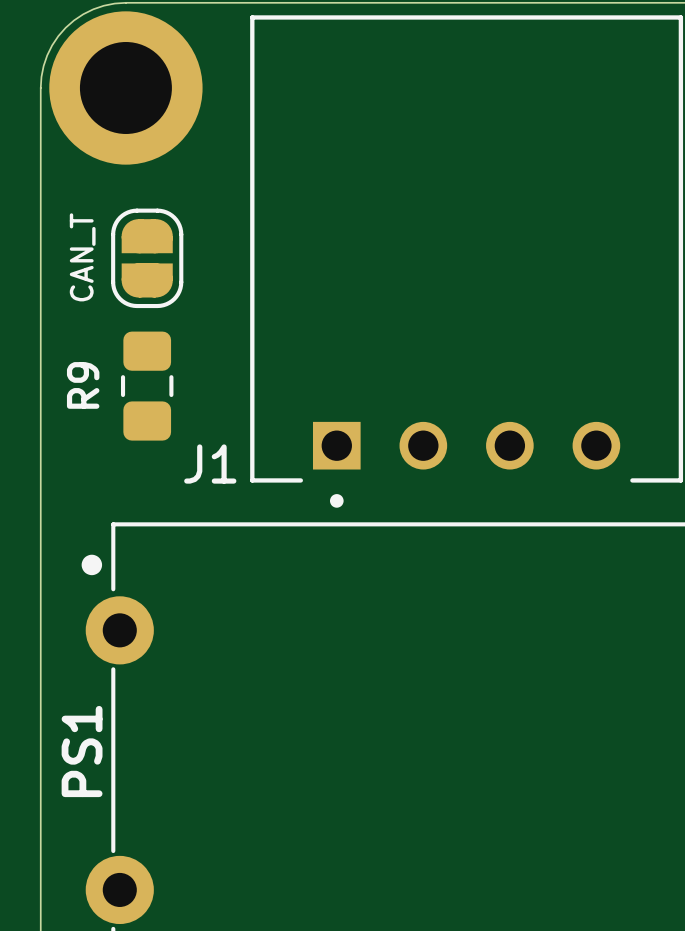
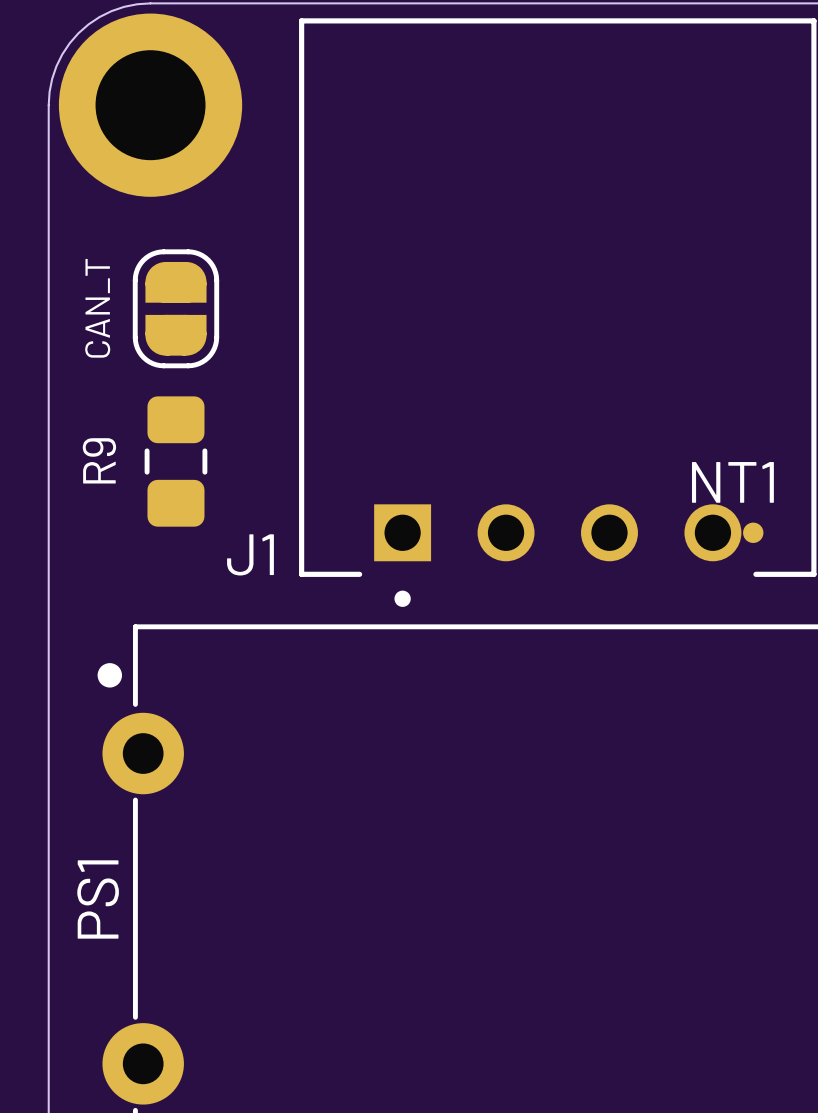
NT1: none -> (732, 532)

